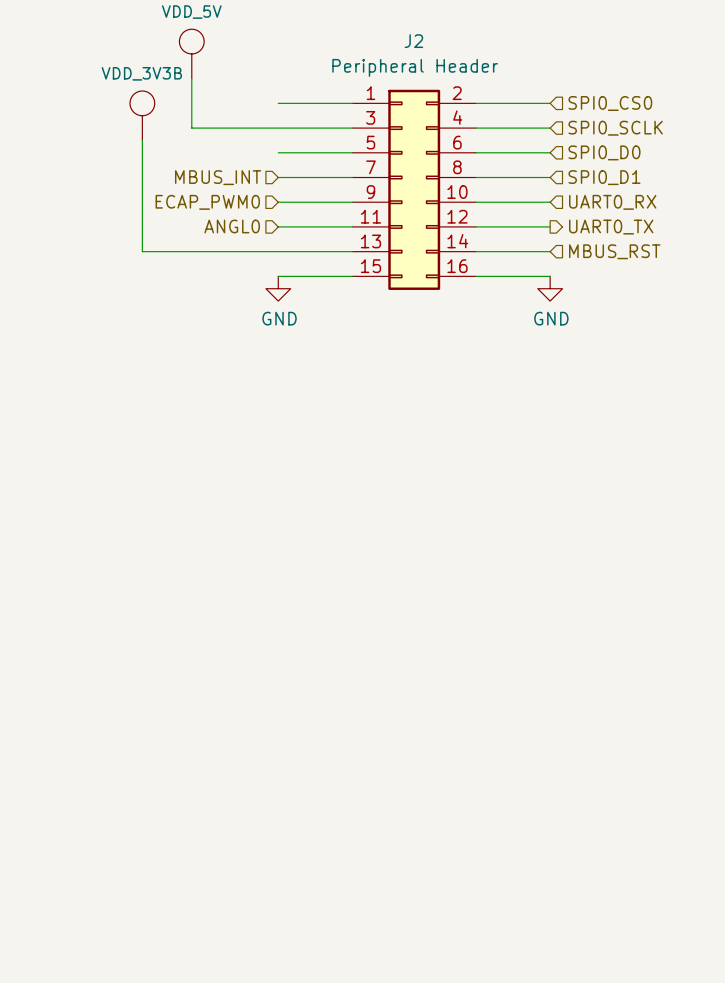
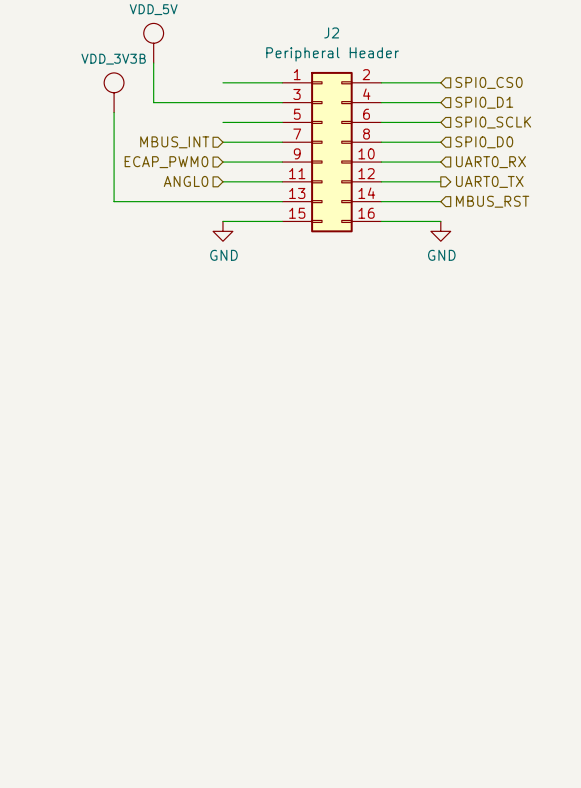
hierarchical label: SPI0_SCLK (615, 128) -> SPI0_D1 (484, 102)
hierarchical label: SPI0_D0 (604, 152) -> SPI0_SCLK (493, 122)
hierarchical label: SPI0_D1 (604, 177) -> SPI0_D0 (484, 142)

